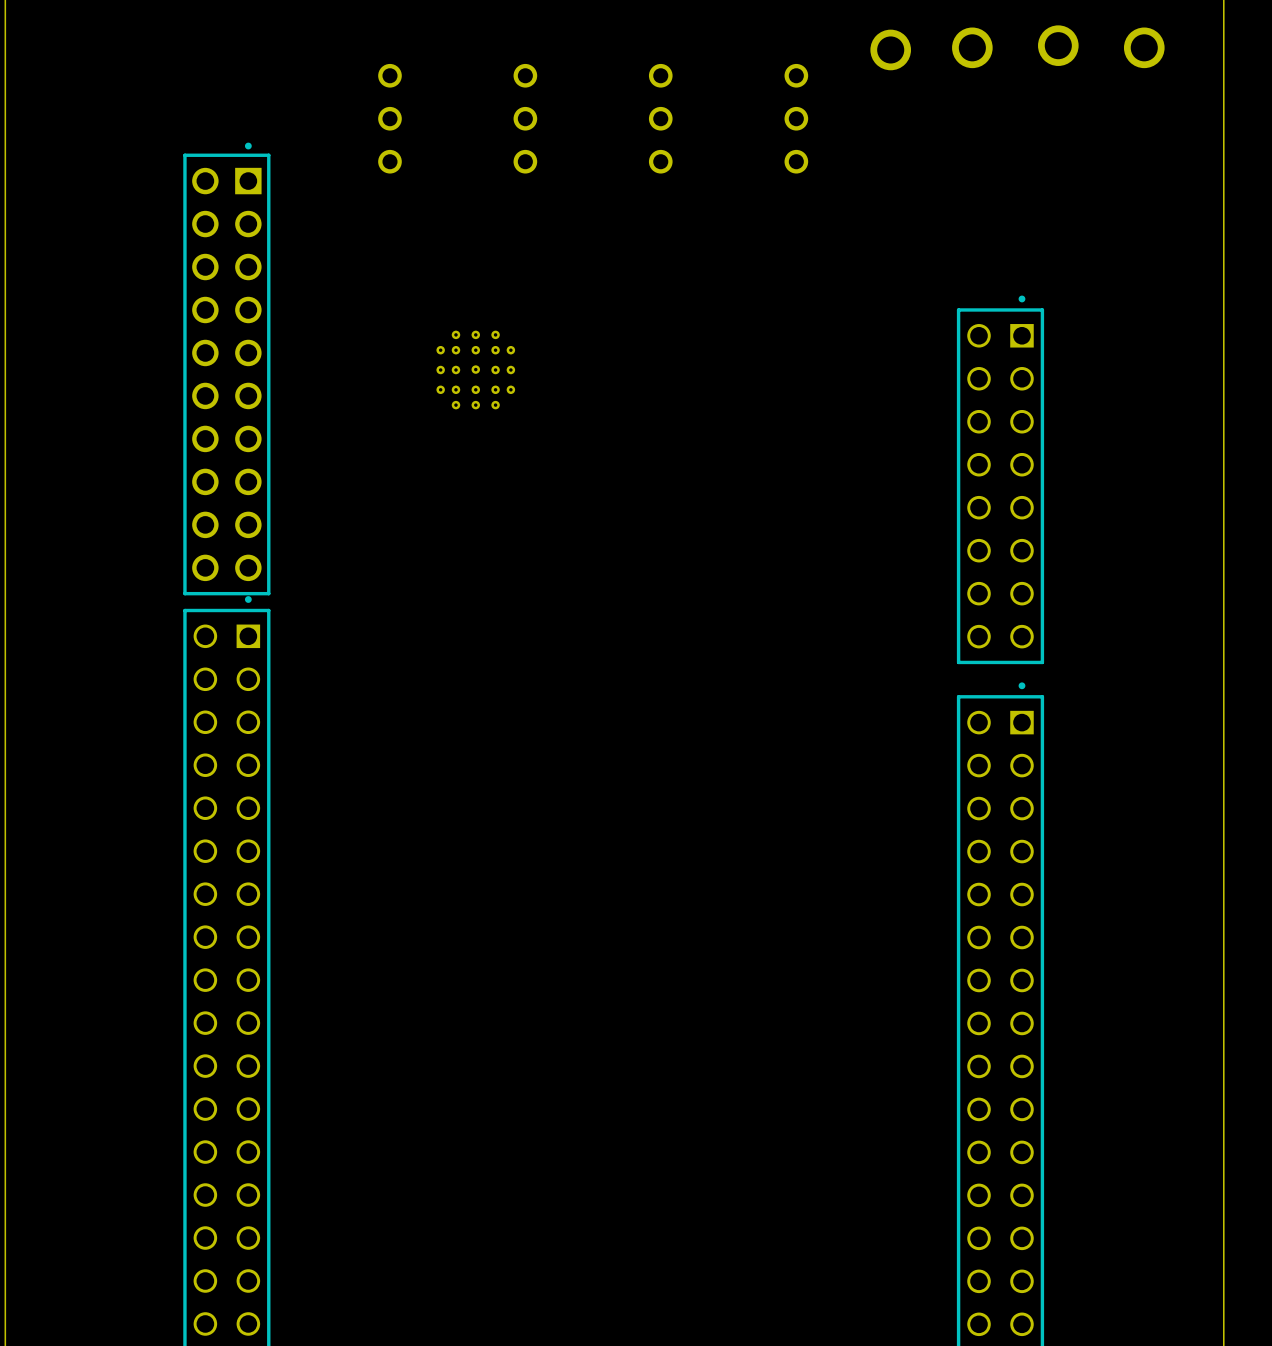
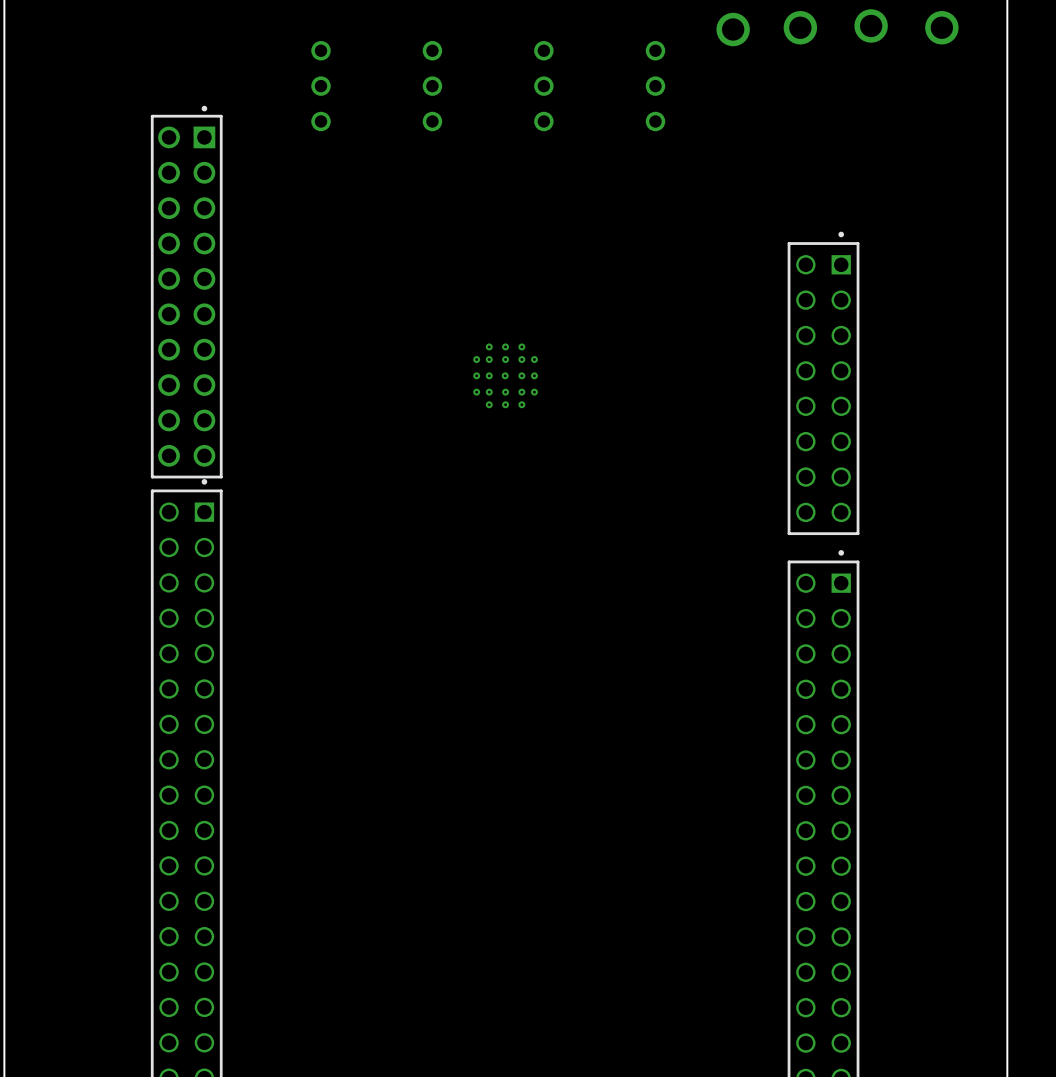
part rotation: 0° (475, 369) -> 90° counterclockwise (505, 375)
part position: (475, 369) -> (505, 375)

